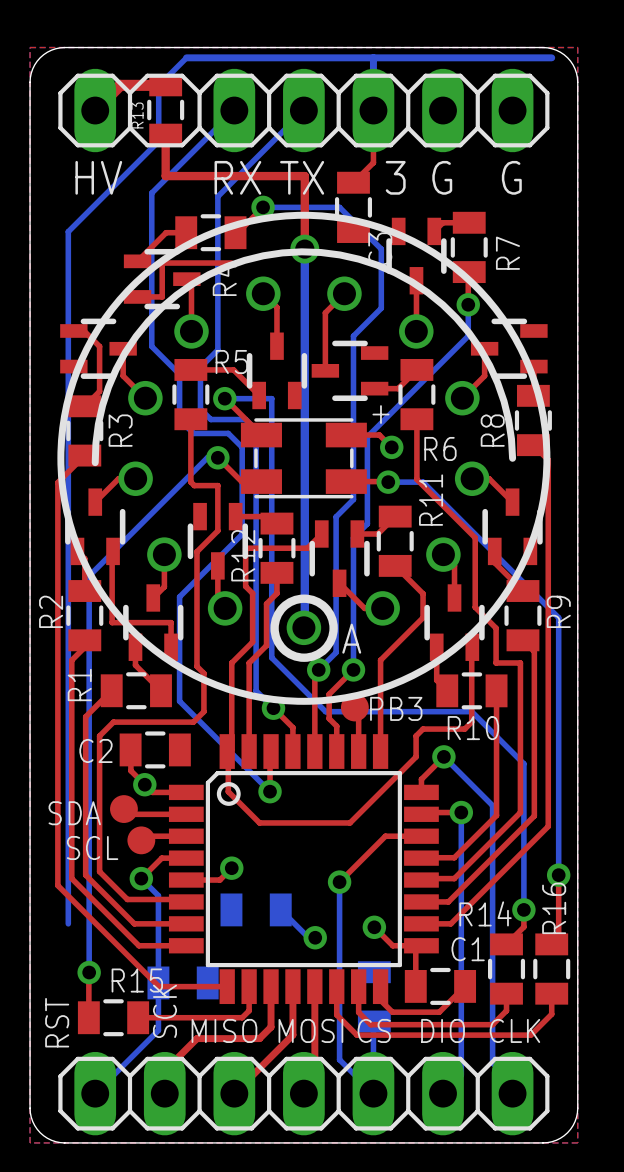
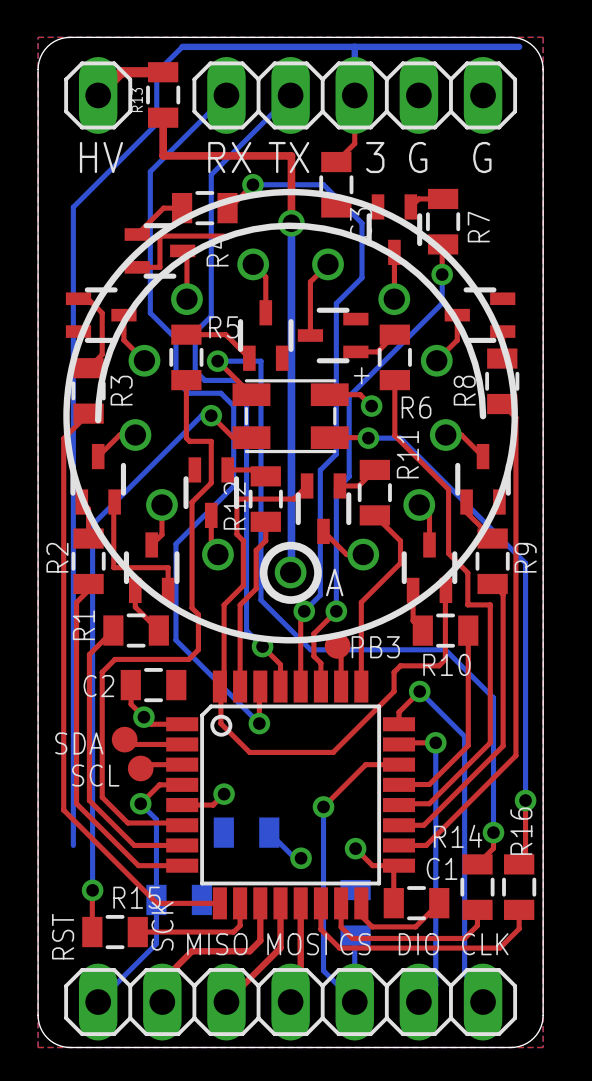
part footprint: [58, 68, 550, 153] -> [64, 56, 518, 134]

